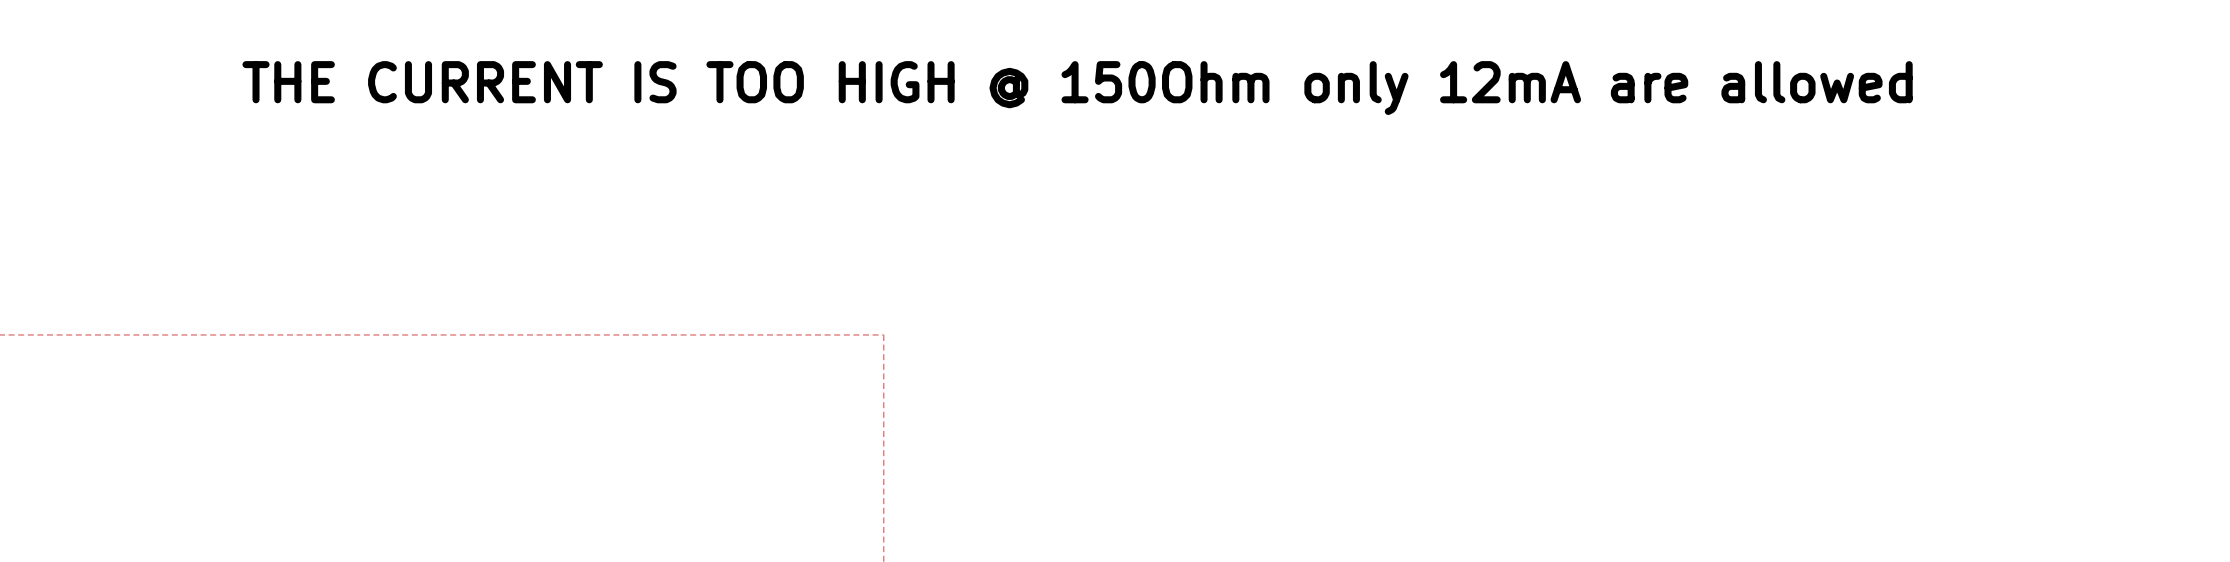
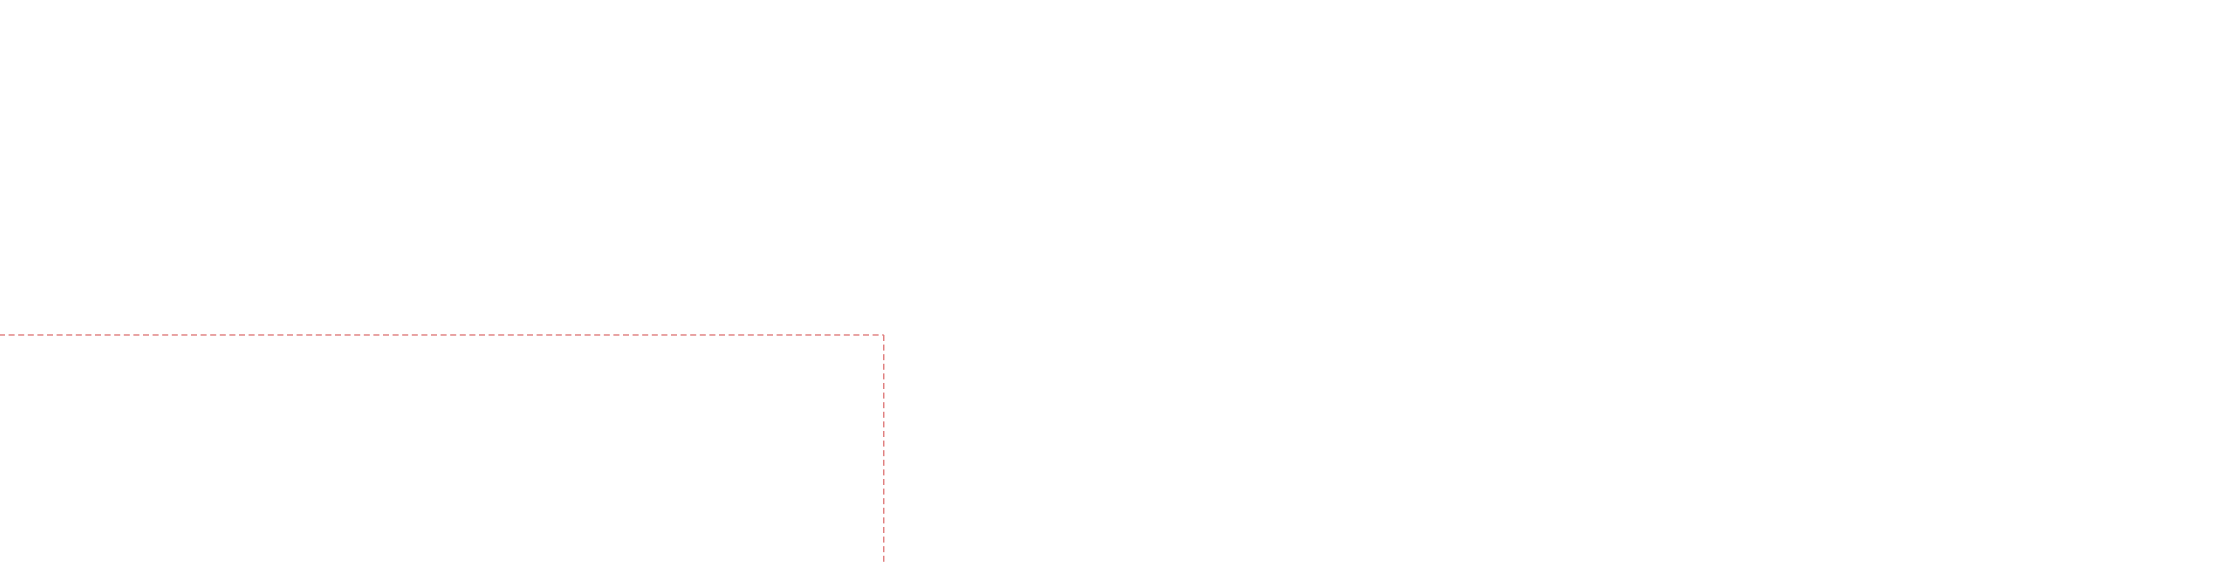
text: THE CURRENT IS TOO HIGH @ 150Ohm only 12mA are allowed (1077, 88) -> none

